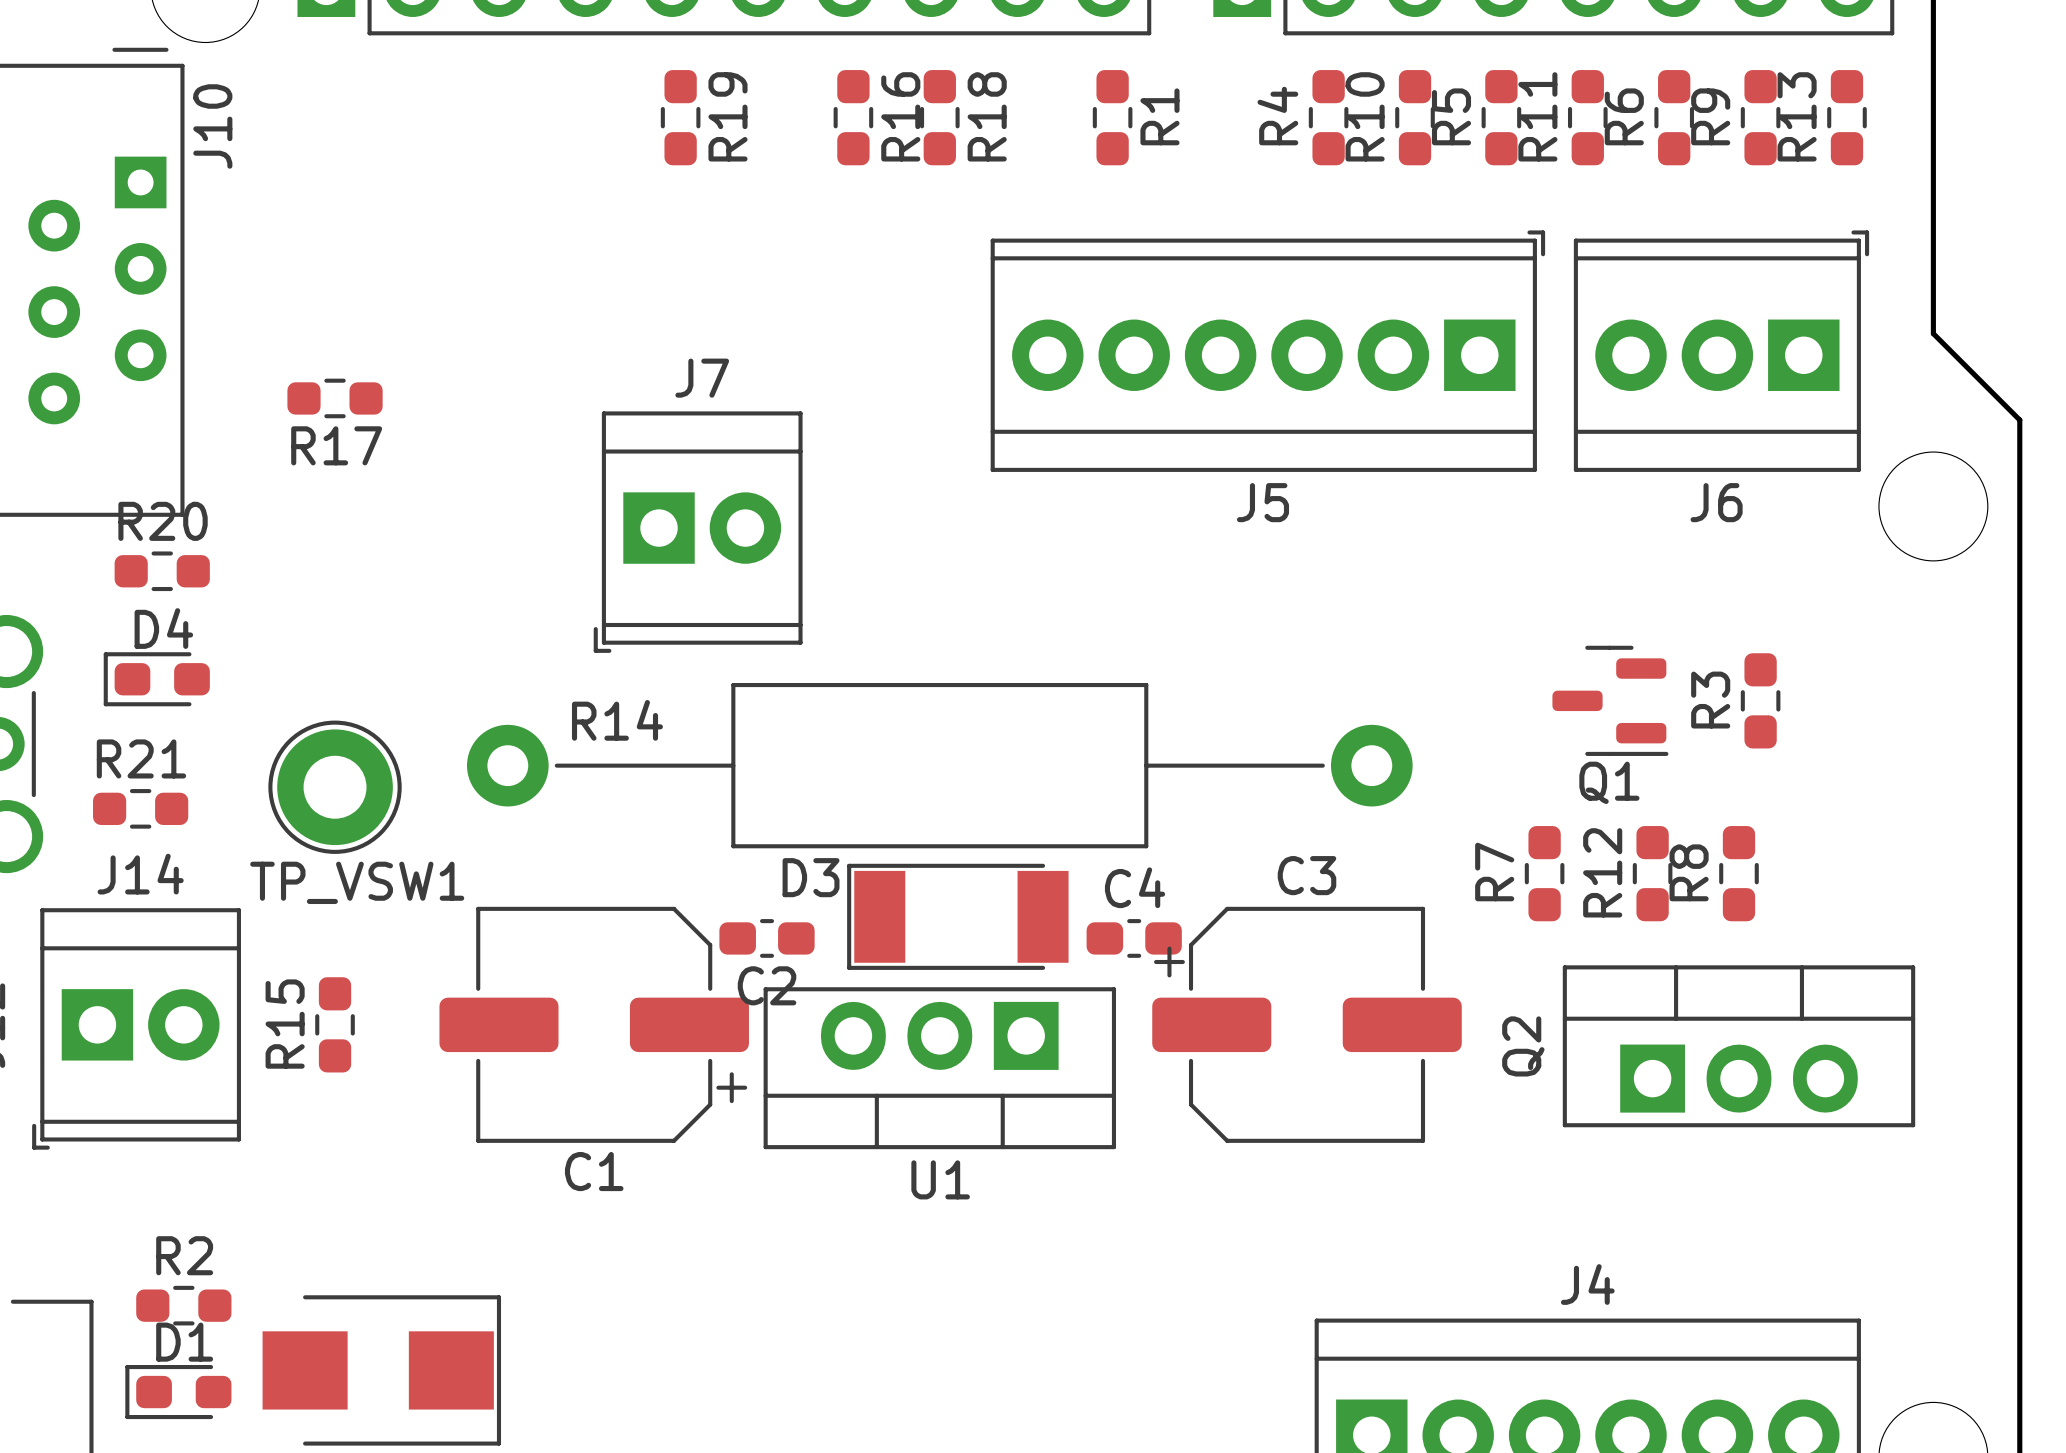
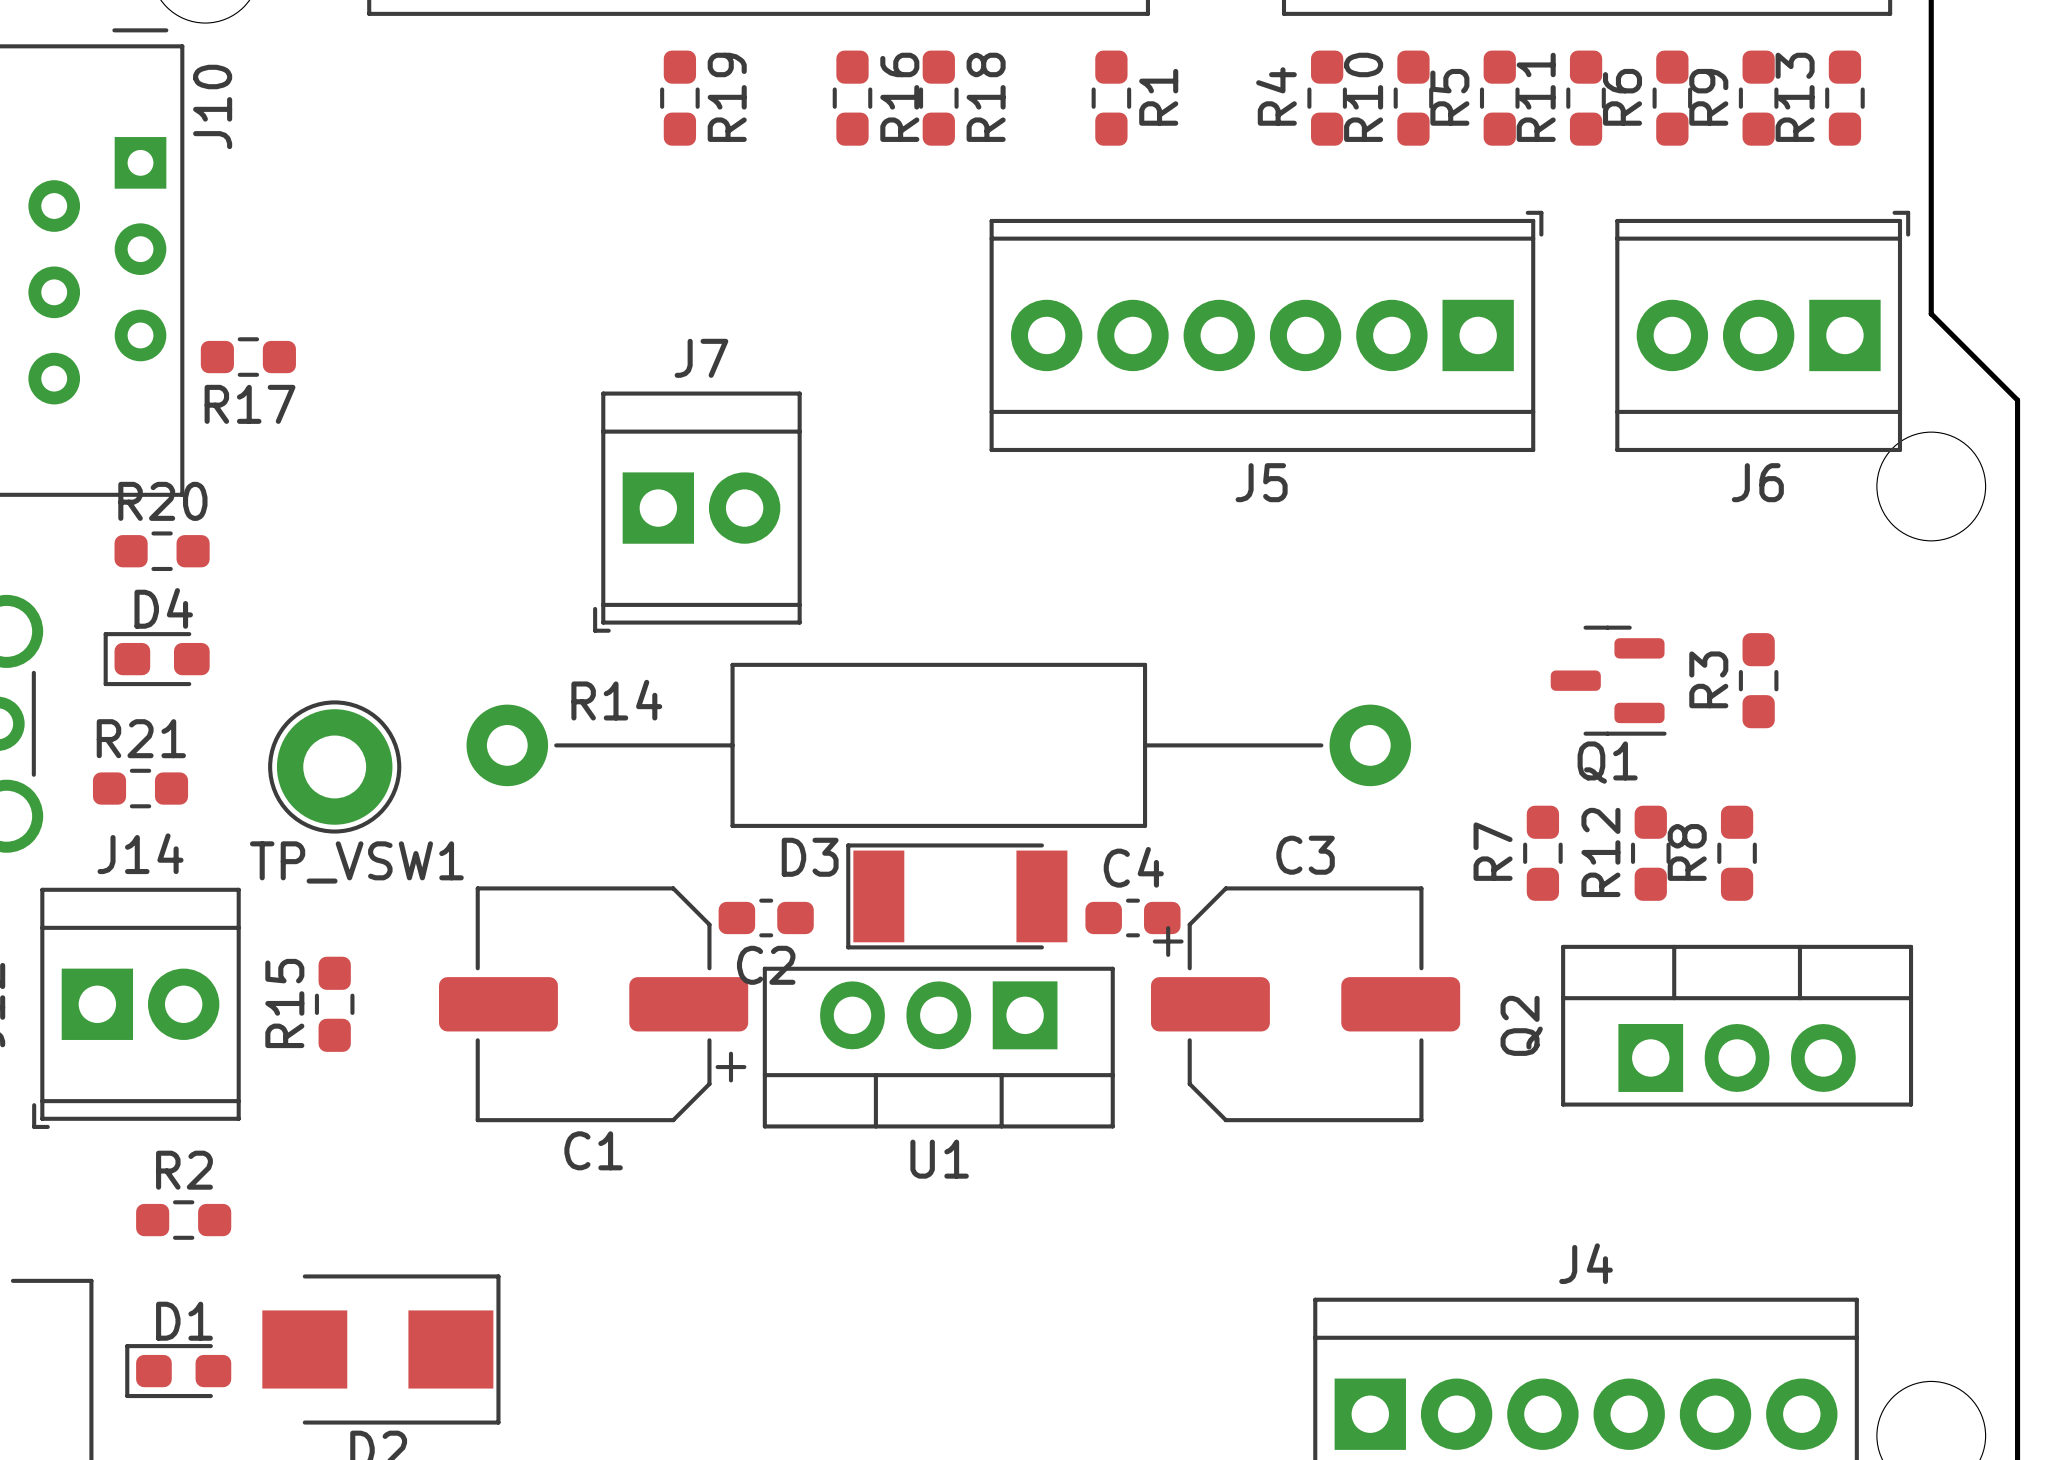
J6 position: (1721, 351) -> (1762, 331)
R17 position: (335, 398) -> (248, 357)
R2 position: (183, 1305) -> (183, 1220)

